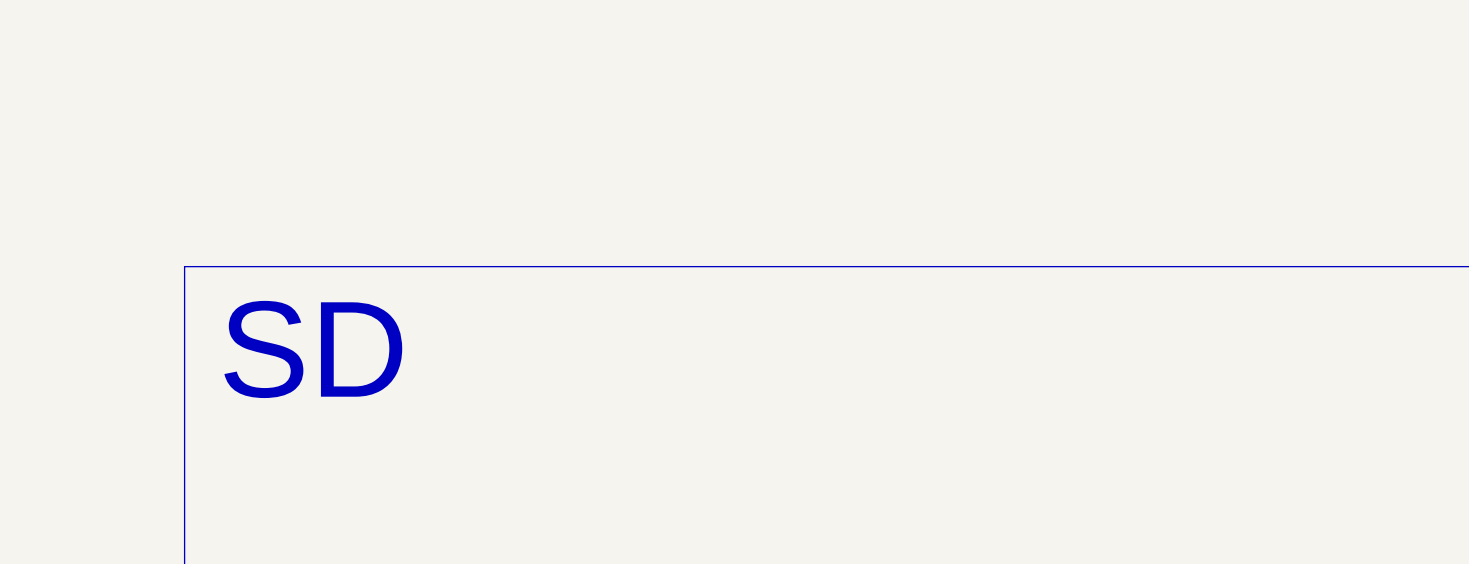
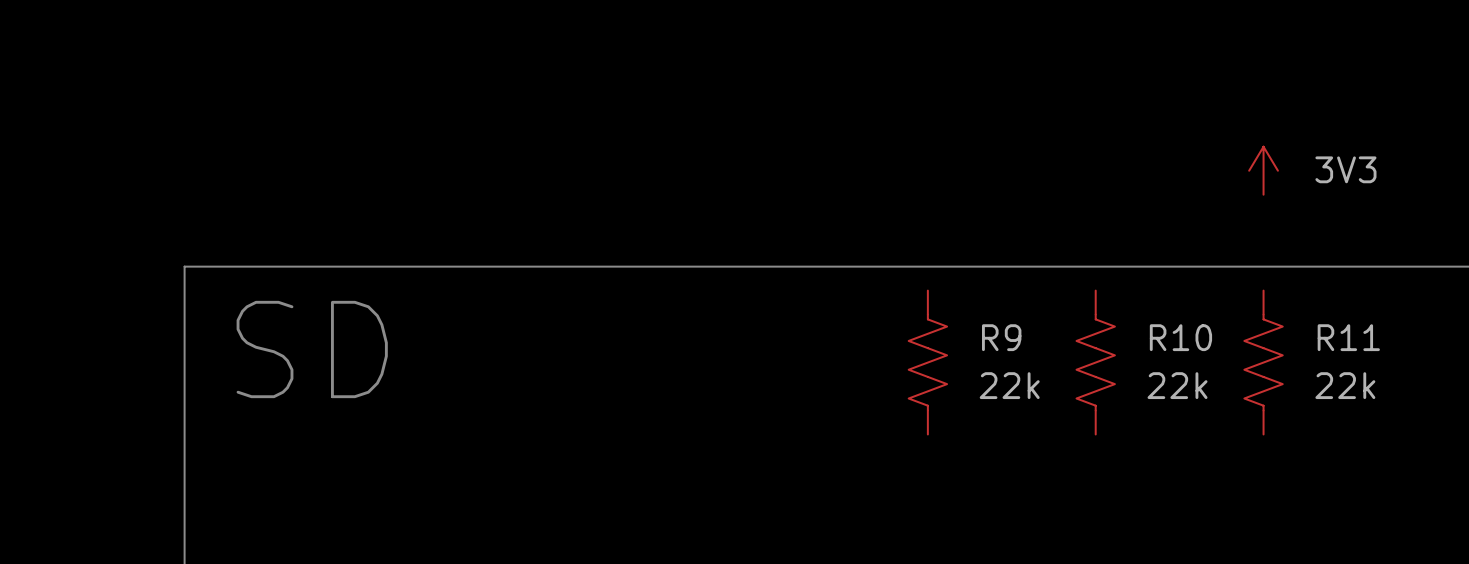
power symbol: none -> 3V3 (1263, 170)
R9: none -> 22k (927, 362)
R10: none -> 22k (1095, 362)
R11: none -> 22k (1263, 362)

